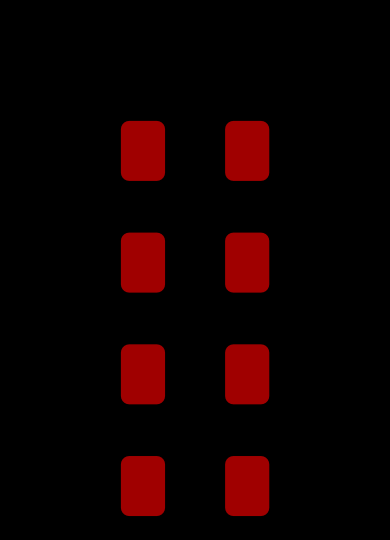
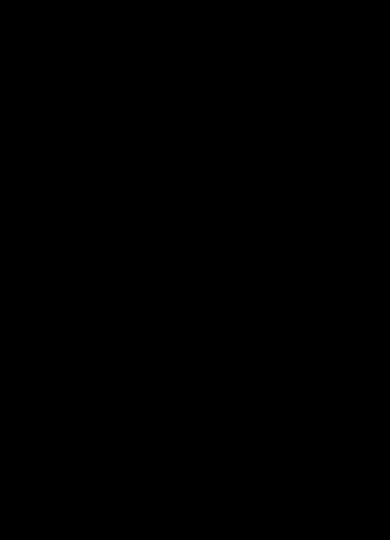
part: (195, 150) -> none
part: (195, 262) -> none
part: (195, 374) -> none
part: (195, 486) -> none

